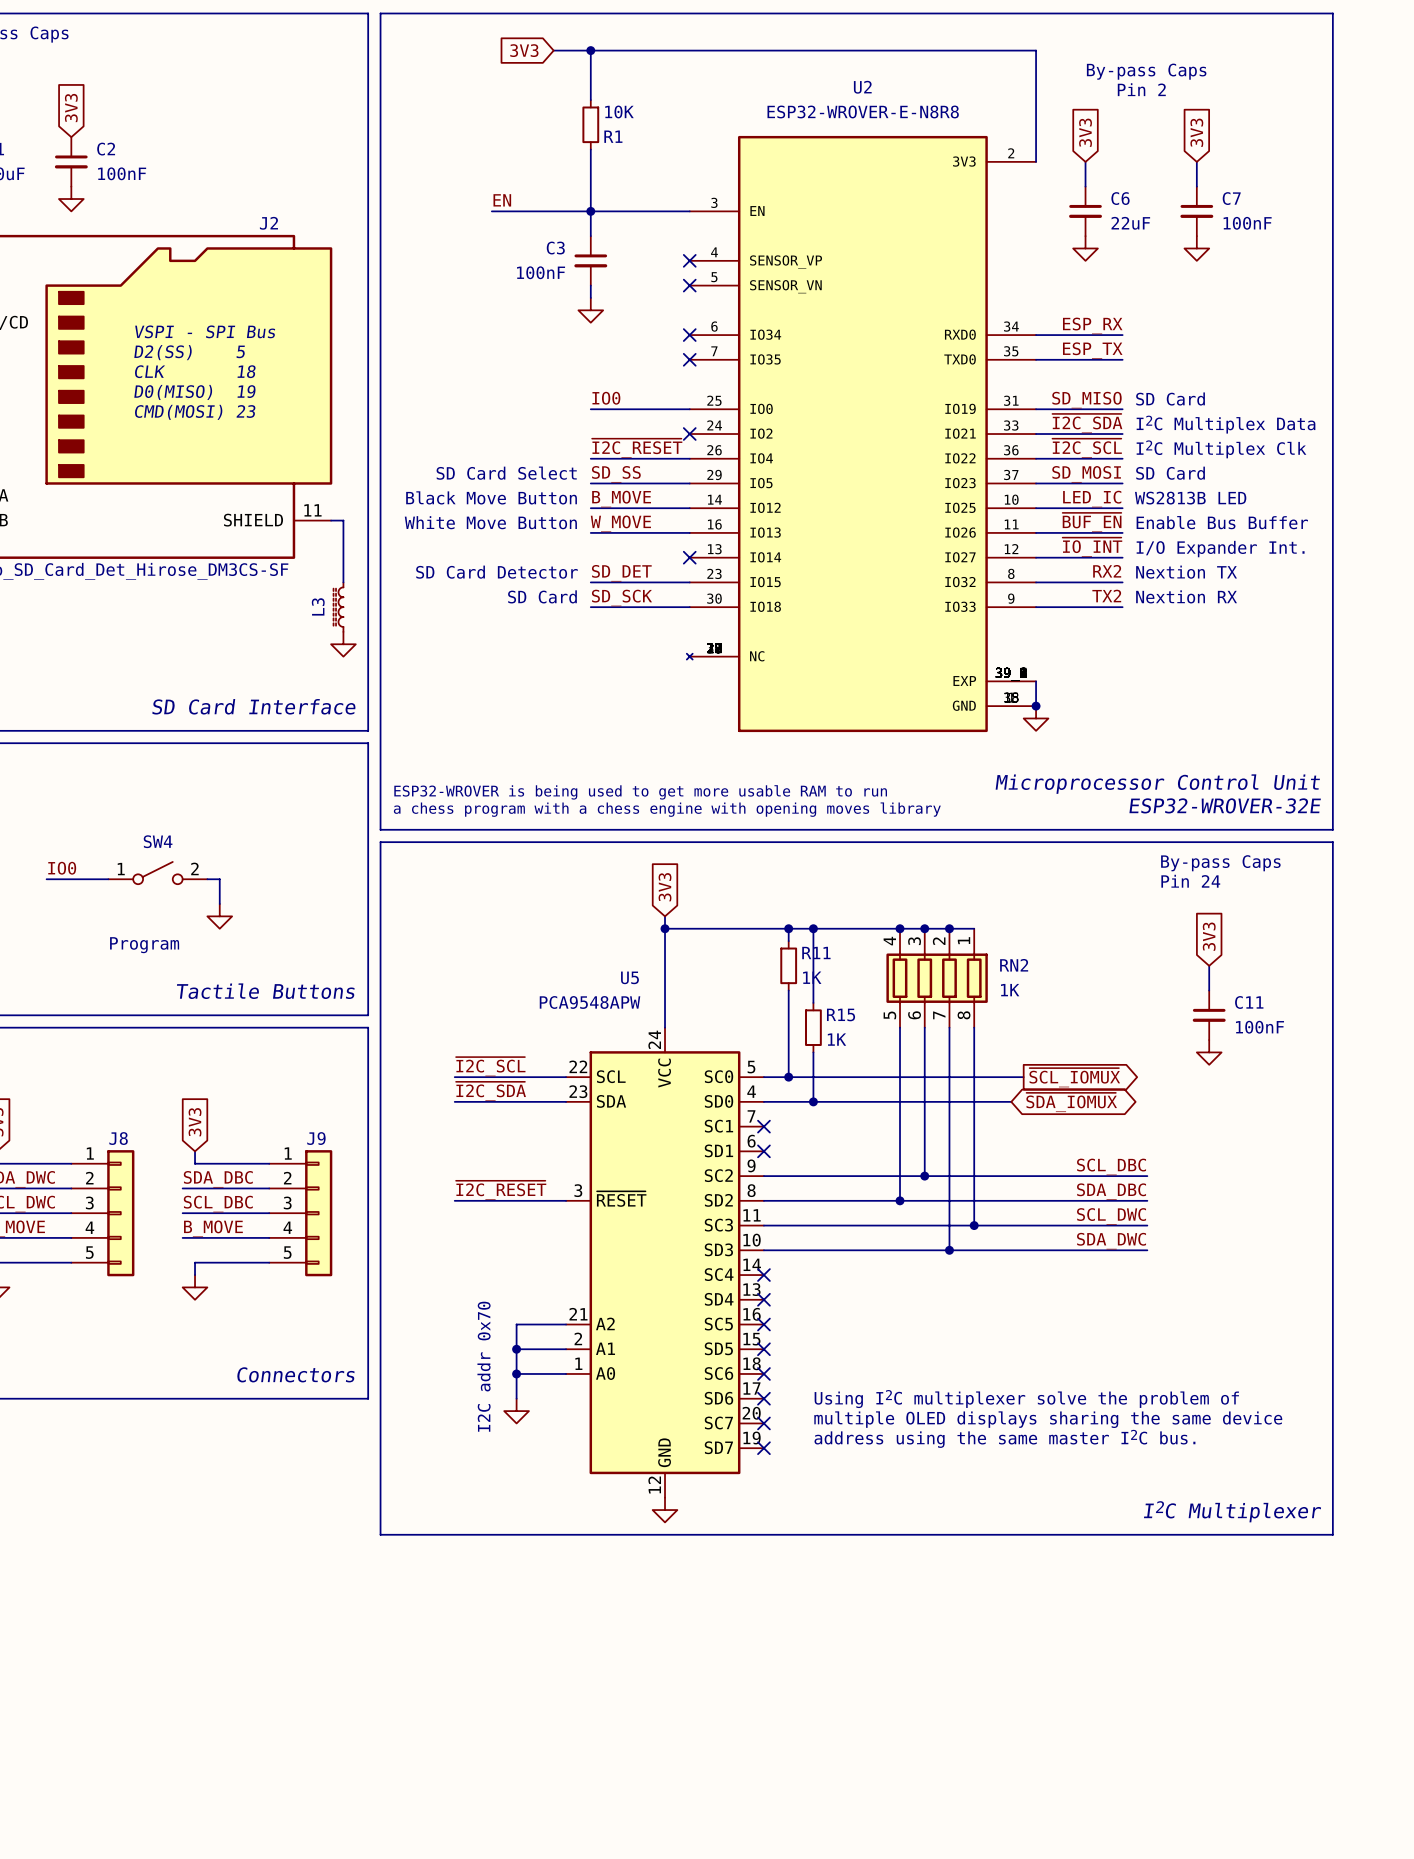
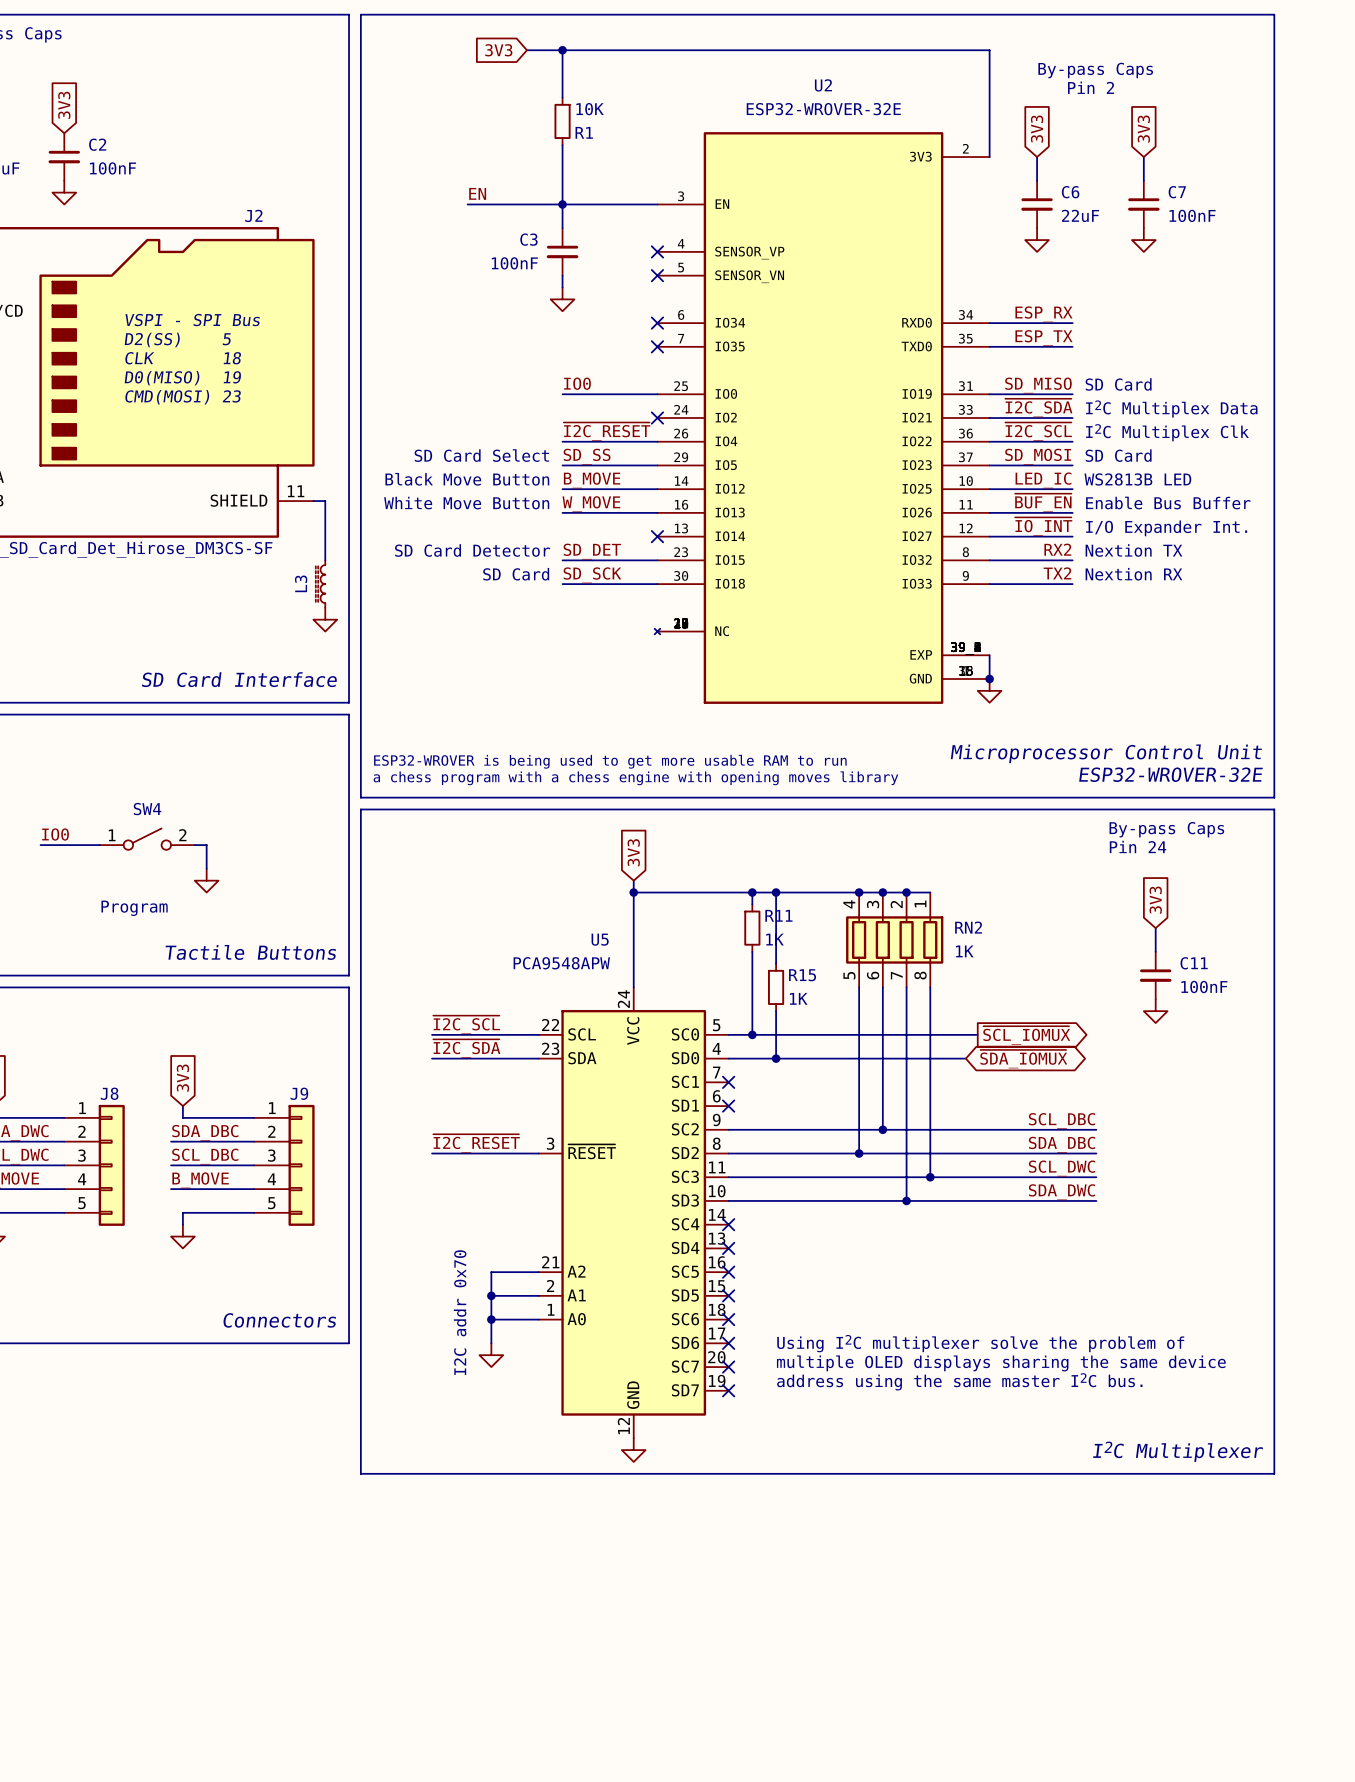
U2 value: ESP32-WROVER-E-N8R8 (863, 111) -> ESP32-WROVER-32E (823, 109)

